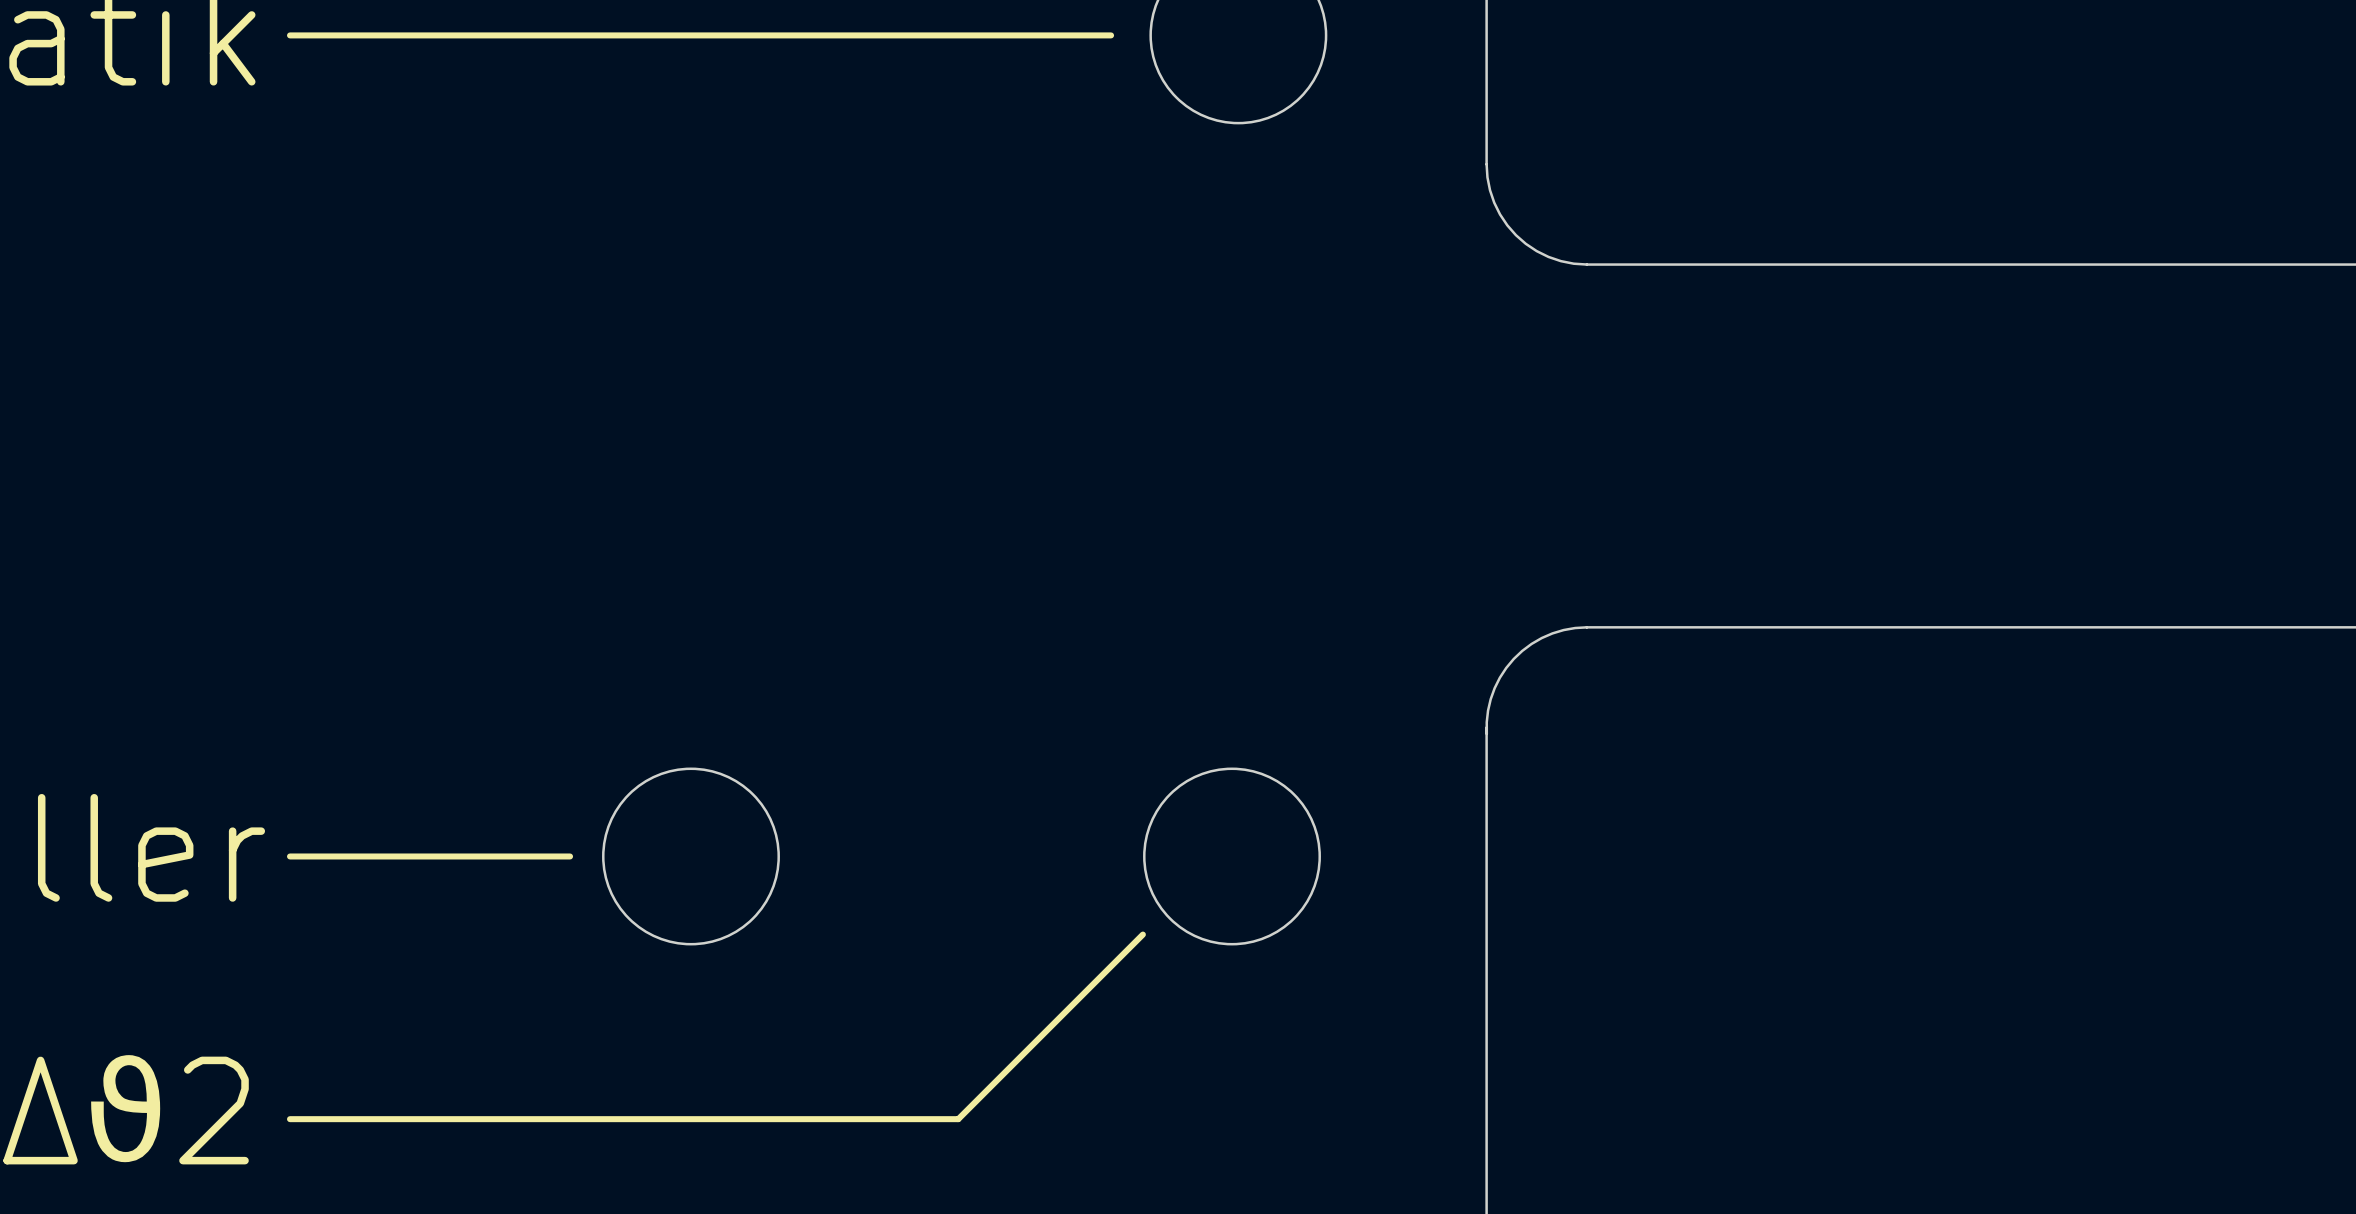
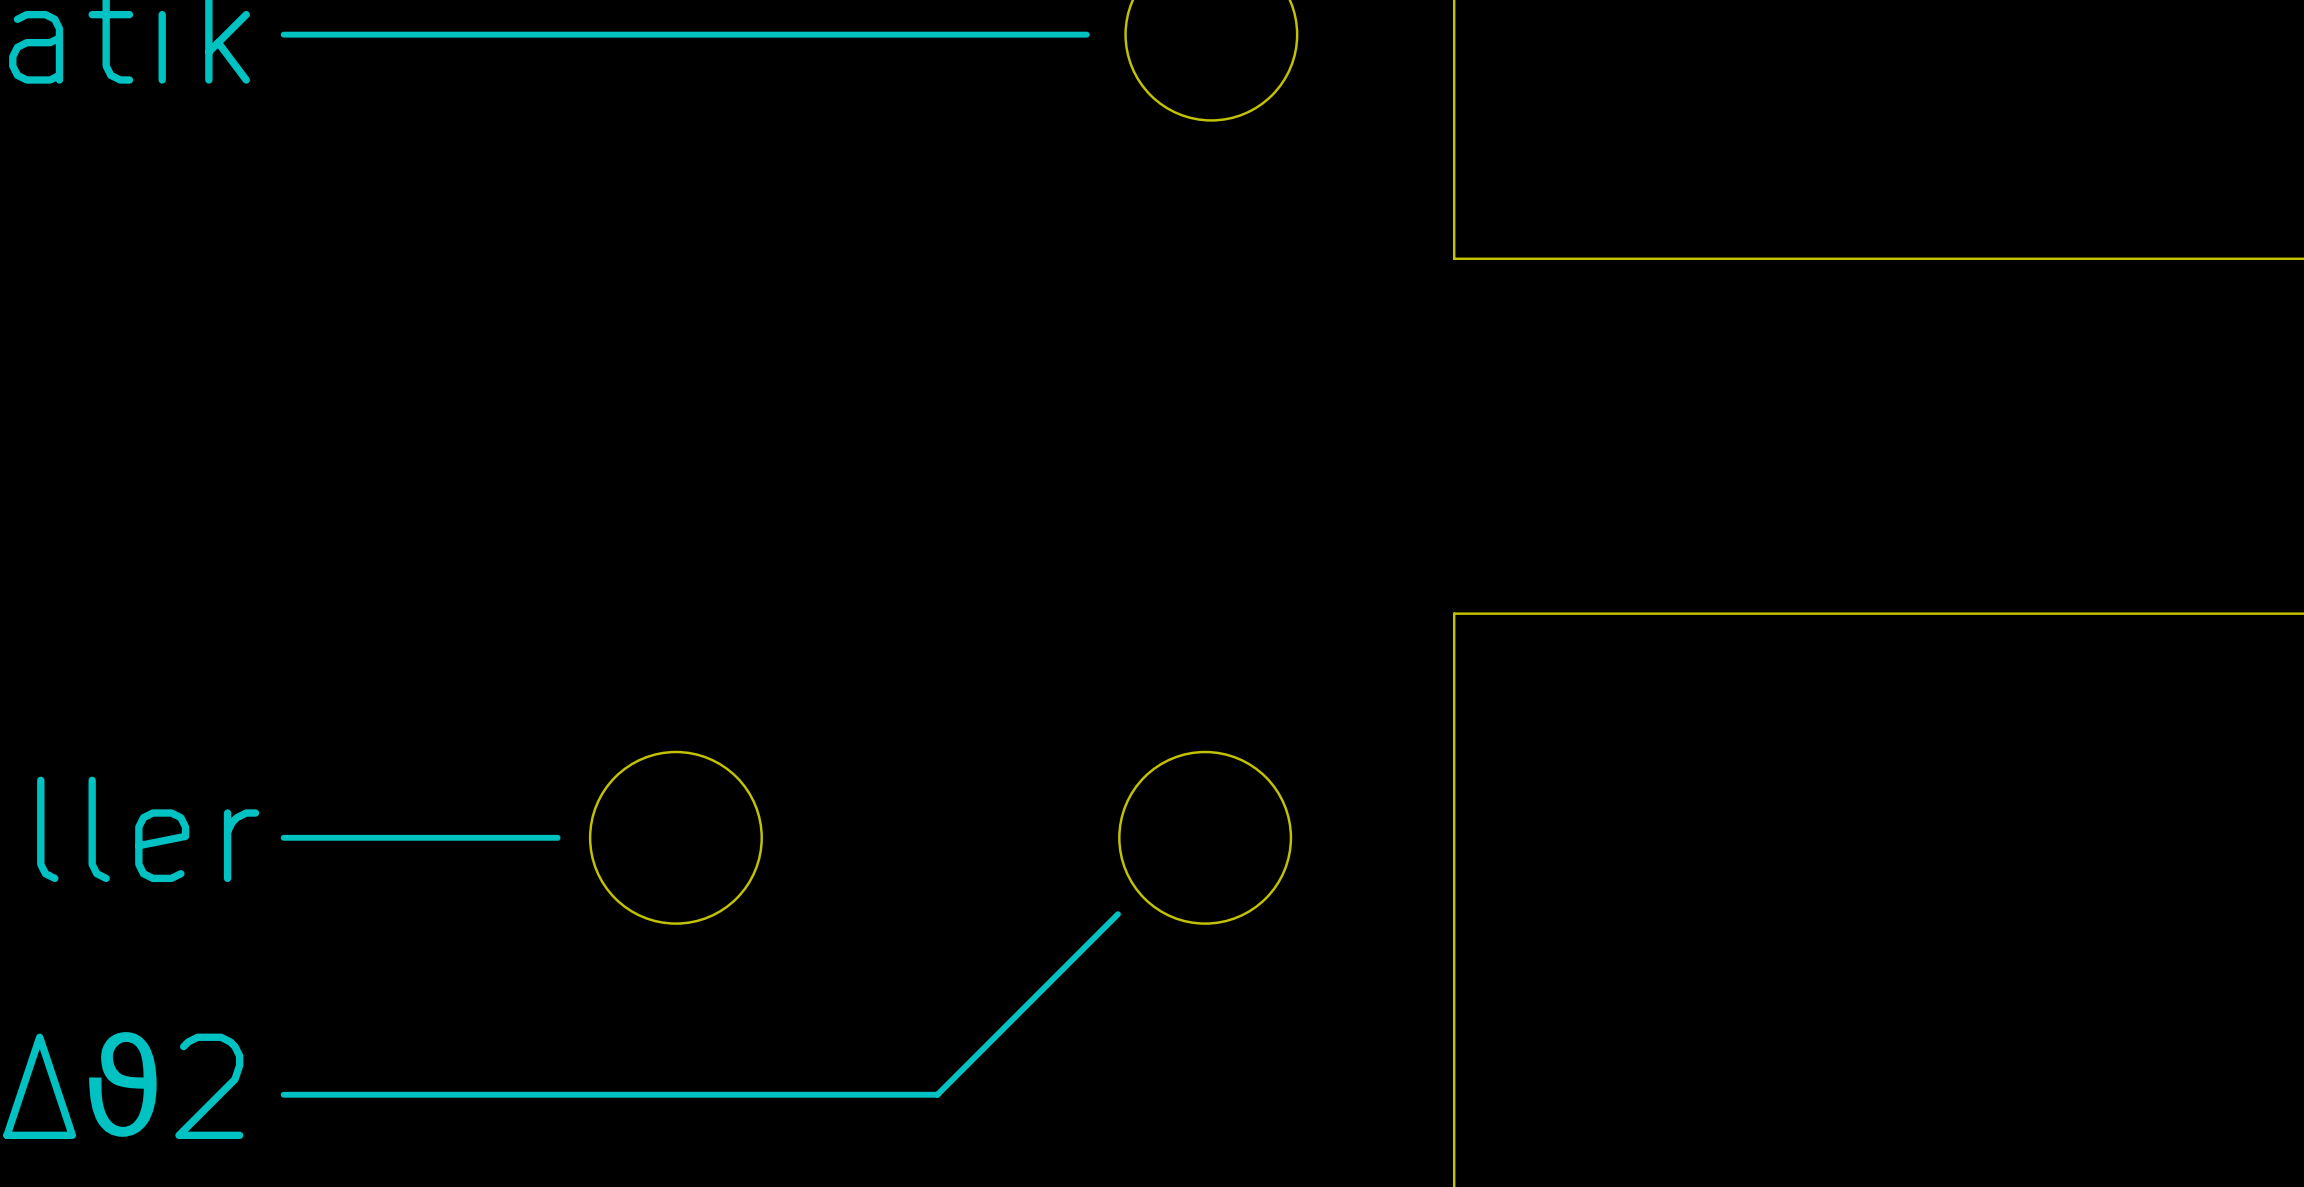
board edge: (1486, 164) (1490, 190) (1494, 202) (1500, 214) (1515, 235) (1536, 251) (1548, 256) (1560, 261) (1586, 264) -> (1454, 160) (1454, 258) (1552, 258)
board edge: (1586, 627) (1552, 633) (1531, 643) (1513, 658) (1499, 677) (1490, 699) (1486, 733) -> (1552, 613) (1454, 613) (1454, 711)

